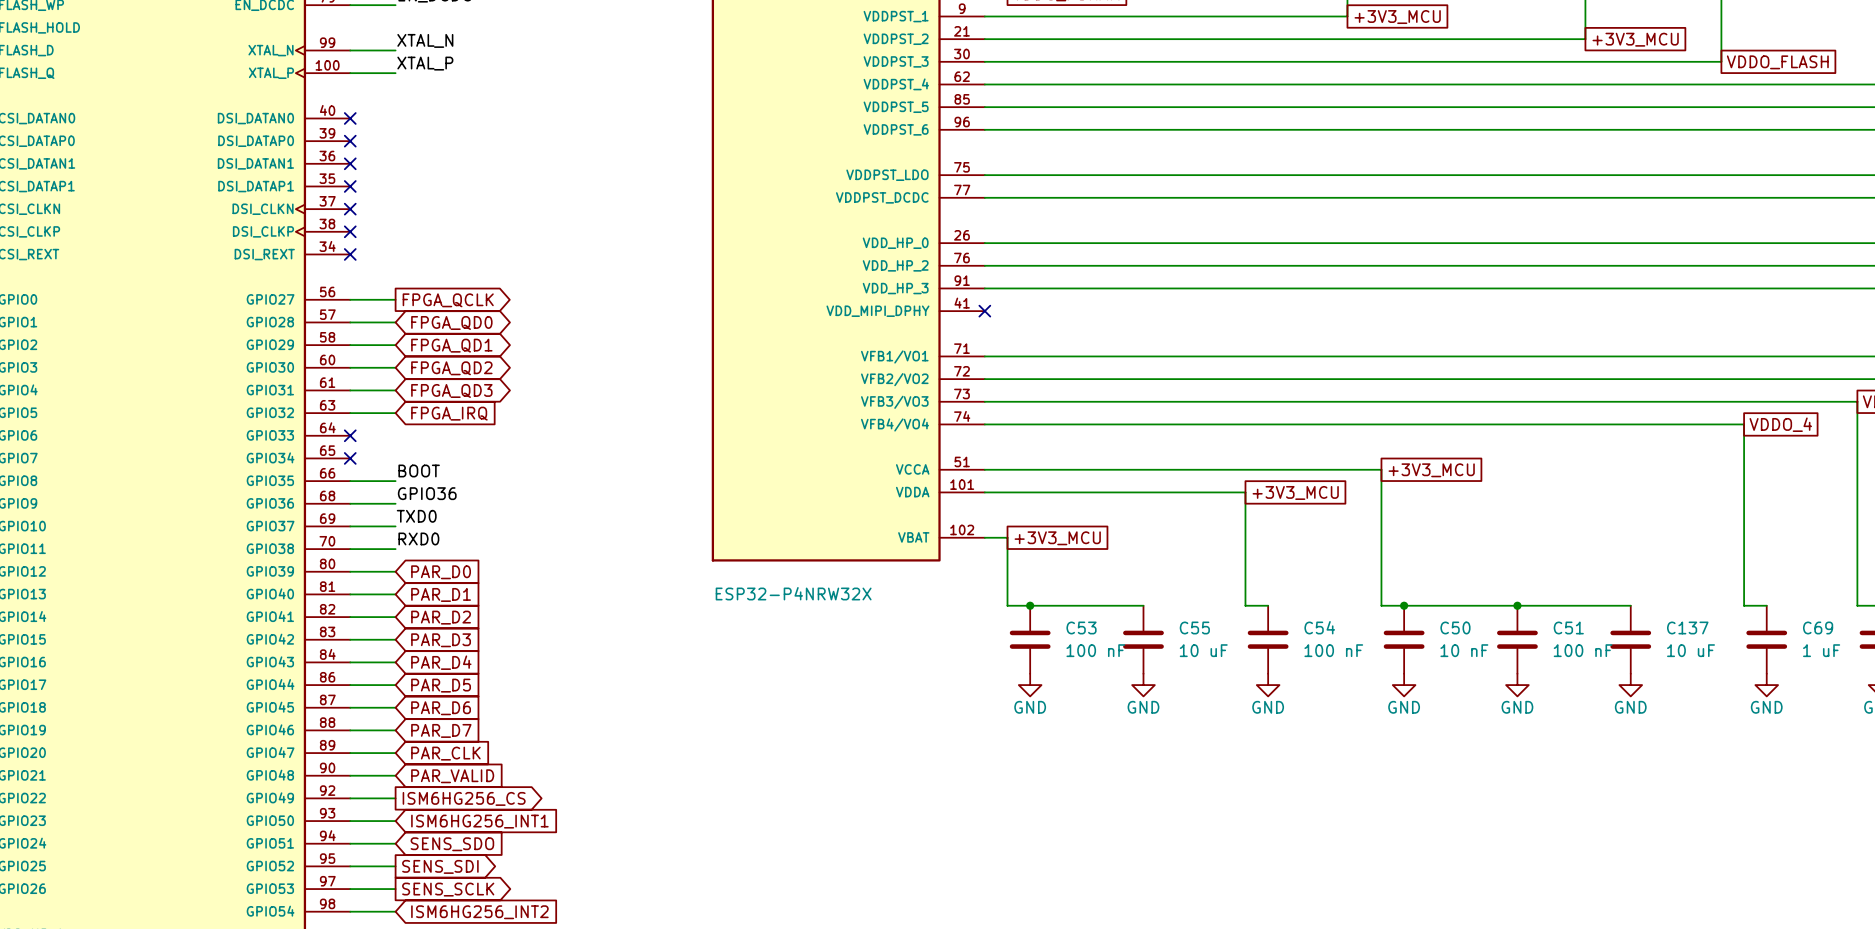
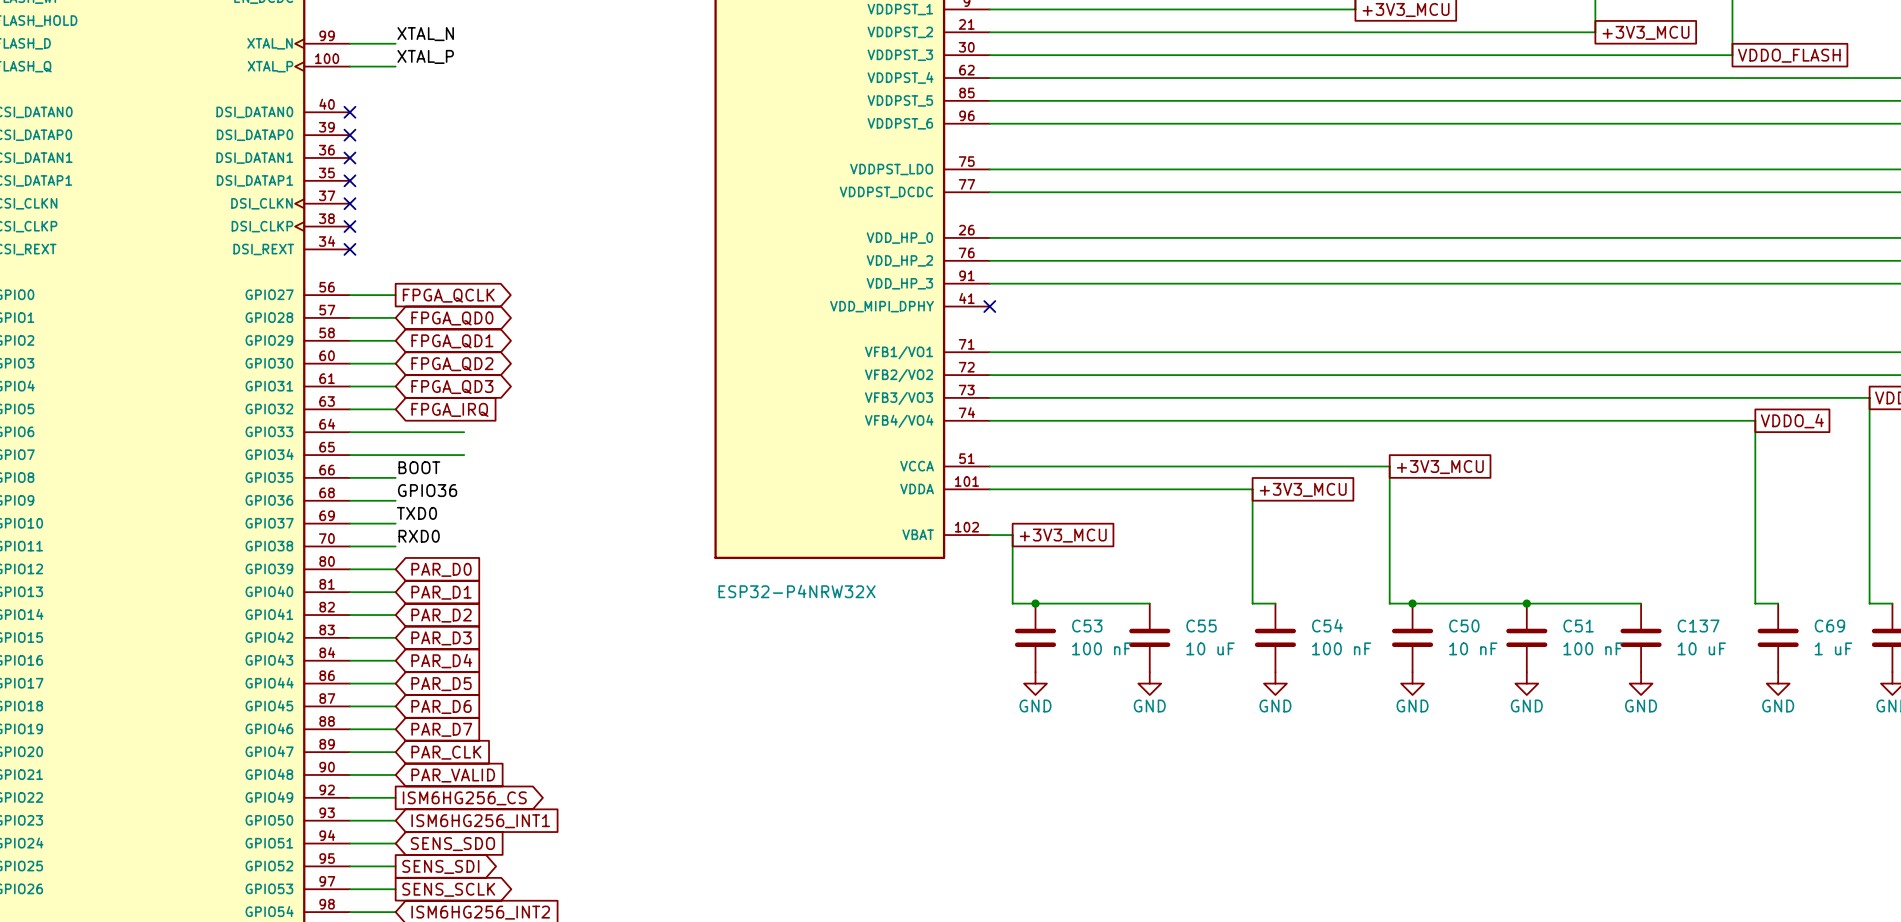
wire: none -> (349, 432) (464, 432)
no-connect mark: (350, 435) -> none
wire: none -> (349, 455) (464, 455)
no-connect mark: (350, 458) -> none

